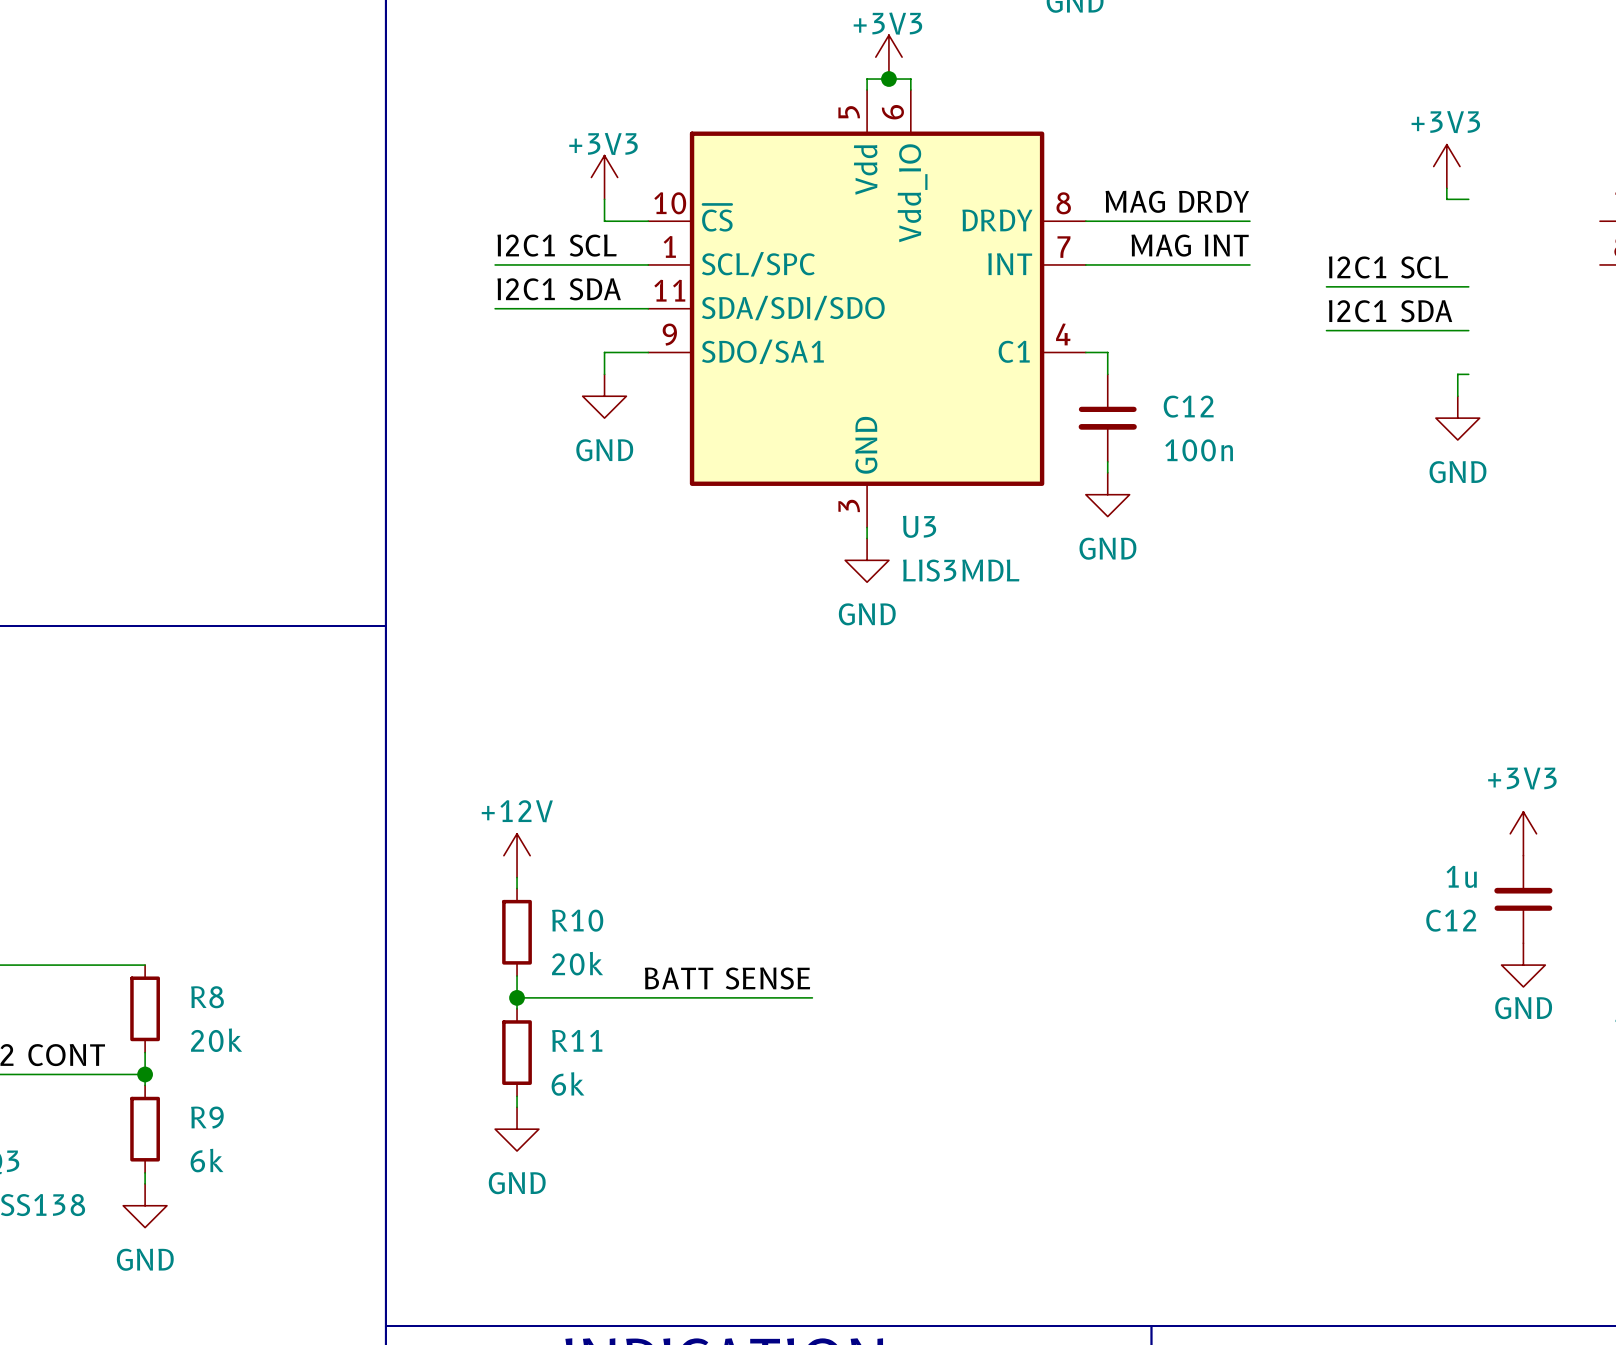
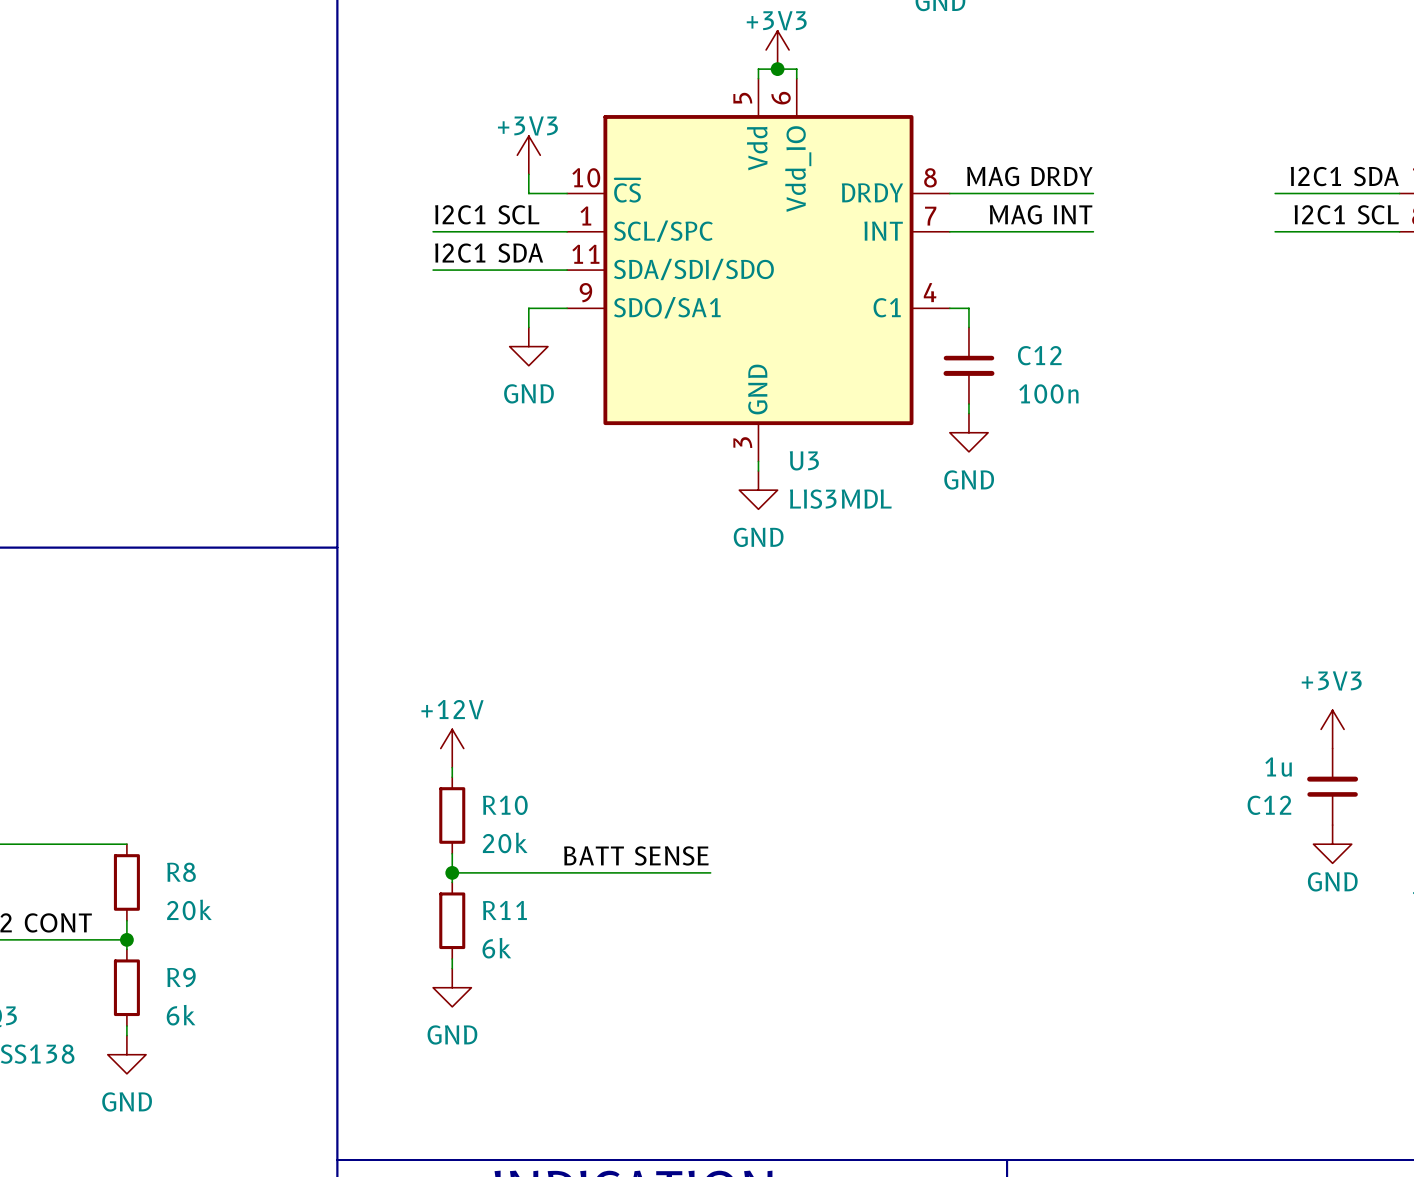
power symbol: +3V3 (1446, 166) -> none
wire: (1446, 188) (1446, 199) (1468, 199) -> none
label position: I2C1 SCL (1388, 267) -> I2C1 SCL (1346, 214)
wire: (1326, 286) (1468, 286) -> (1275, 231) (1399, 231)
label position: I2C1 SDA (1390, 311) -> I2C1 SDA (1344, 176)
wire: (1326, 330) (1468, 330) -> (1275, 193) (1399, 193)
wire: (1468, 374) (1457, 374) (1457, 396) -> none
power symbol: GND (1457, 418) -> none

